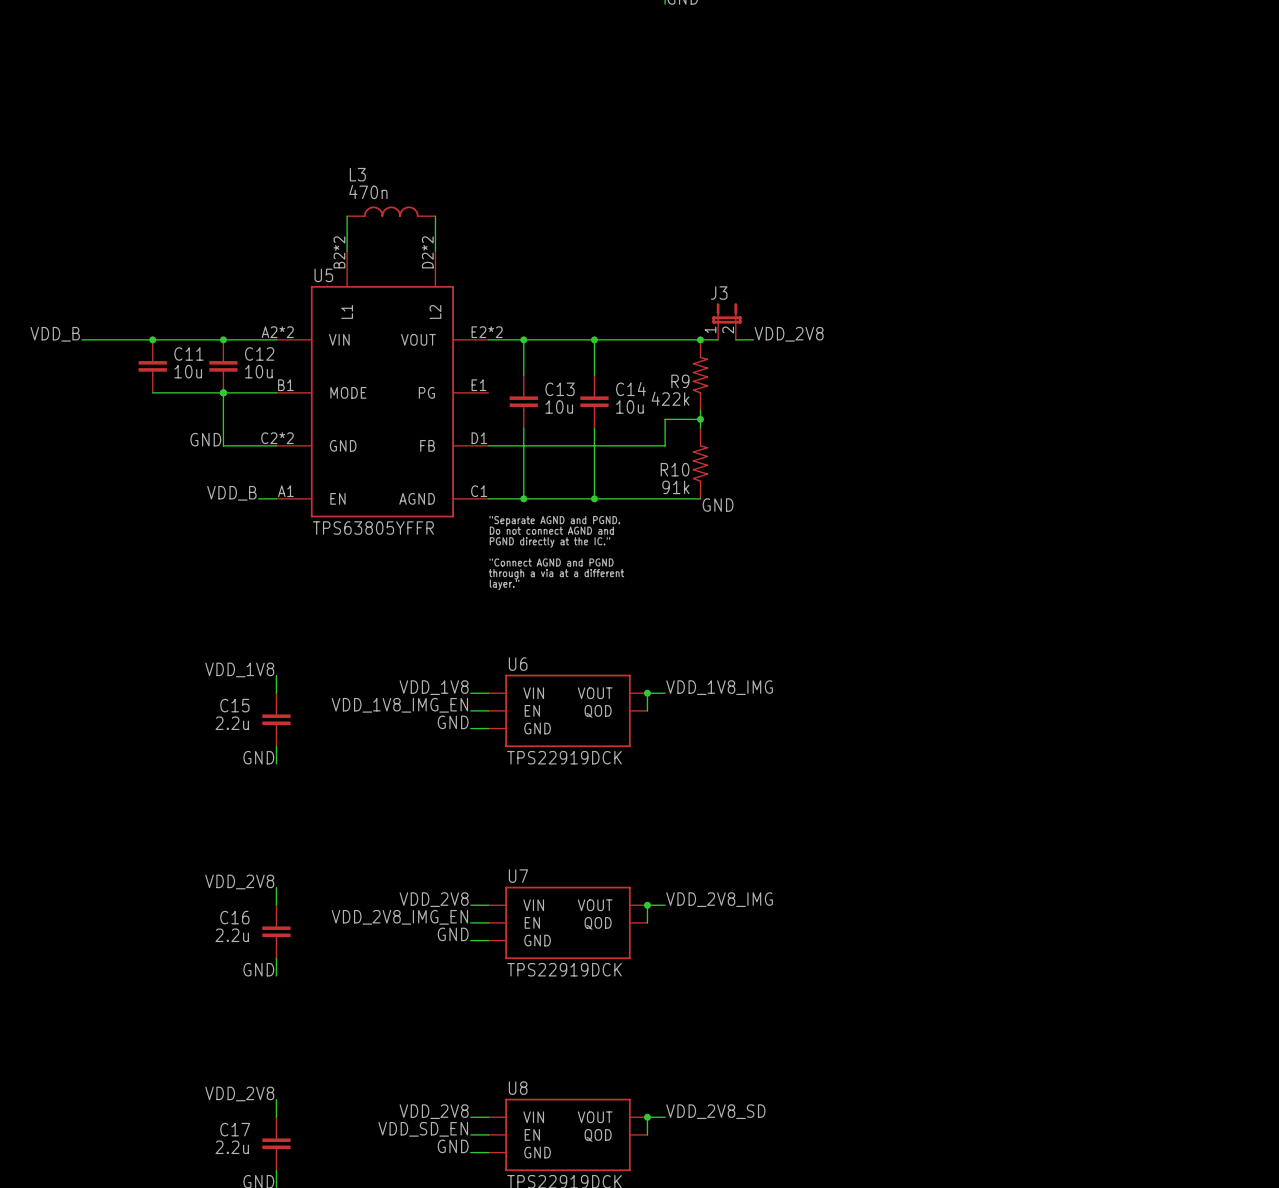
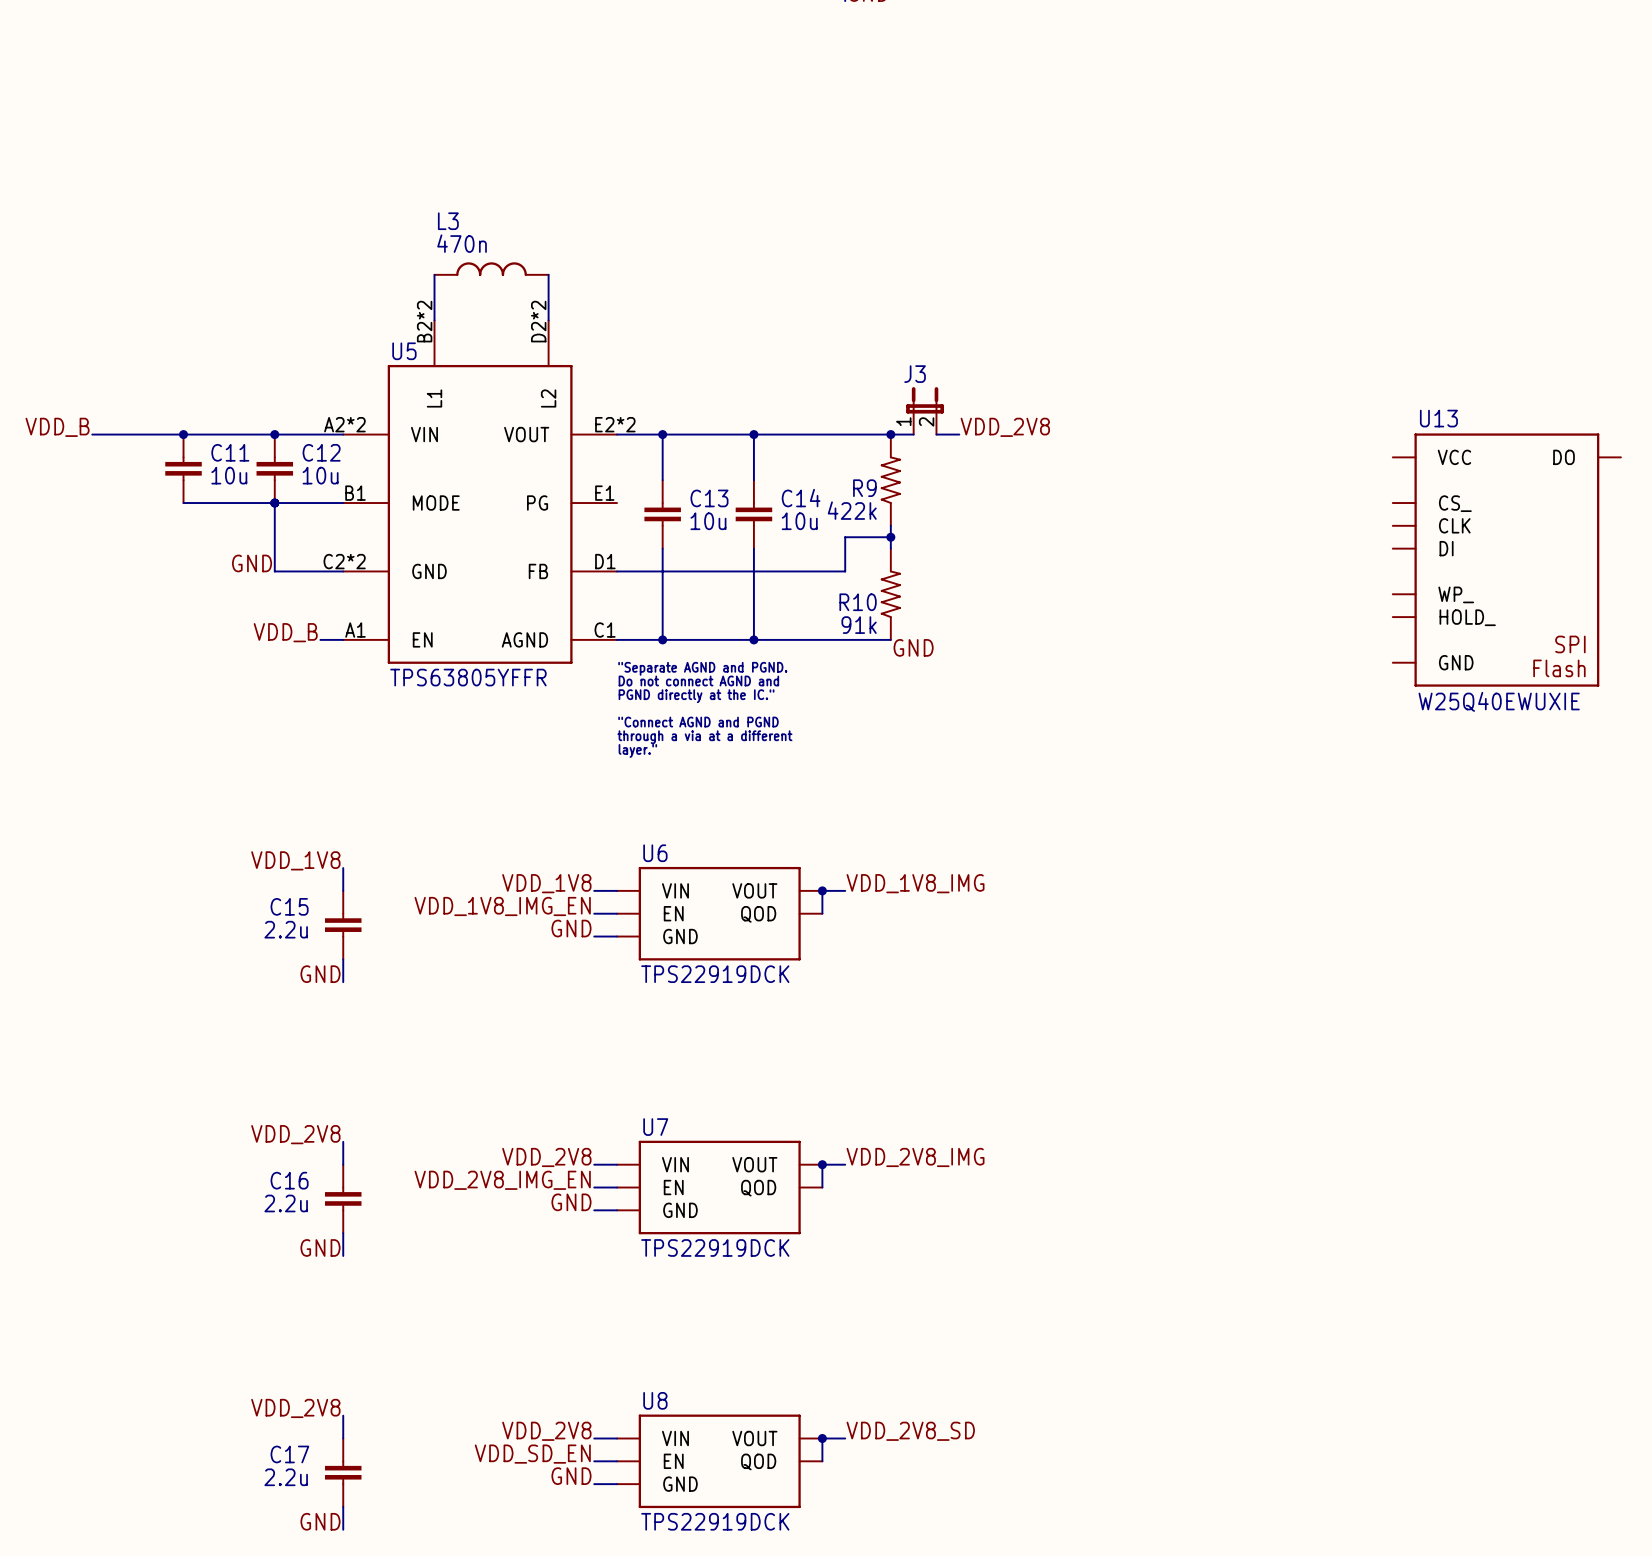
U13: none -> (1506, 560)

